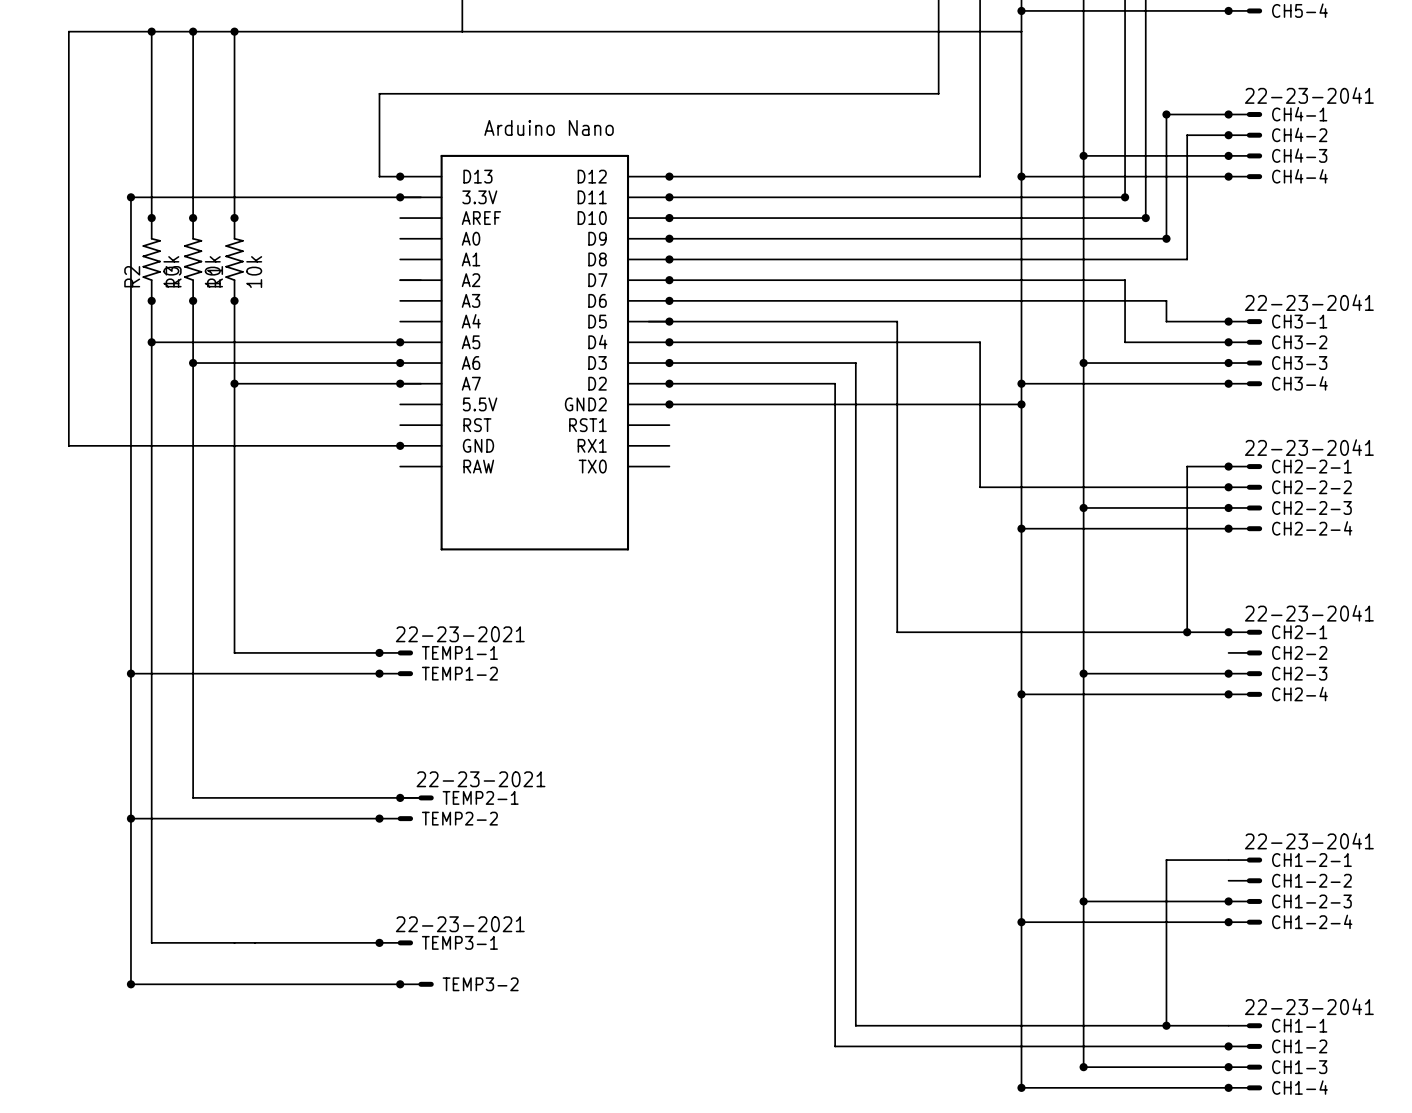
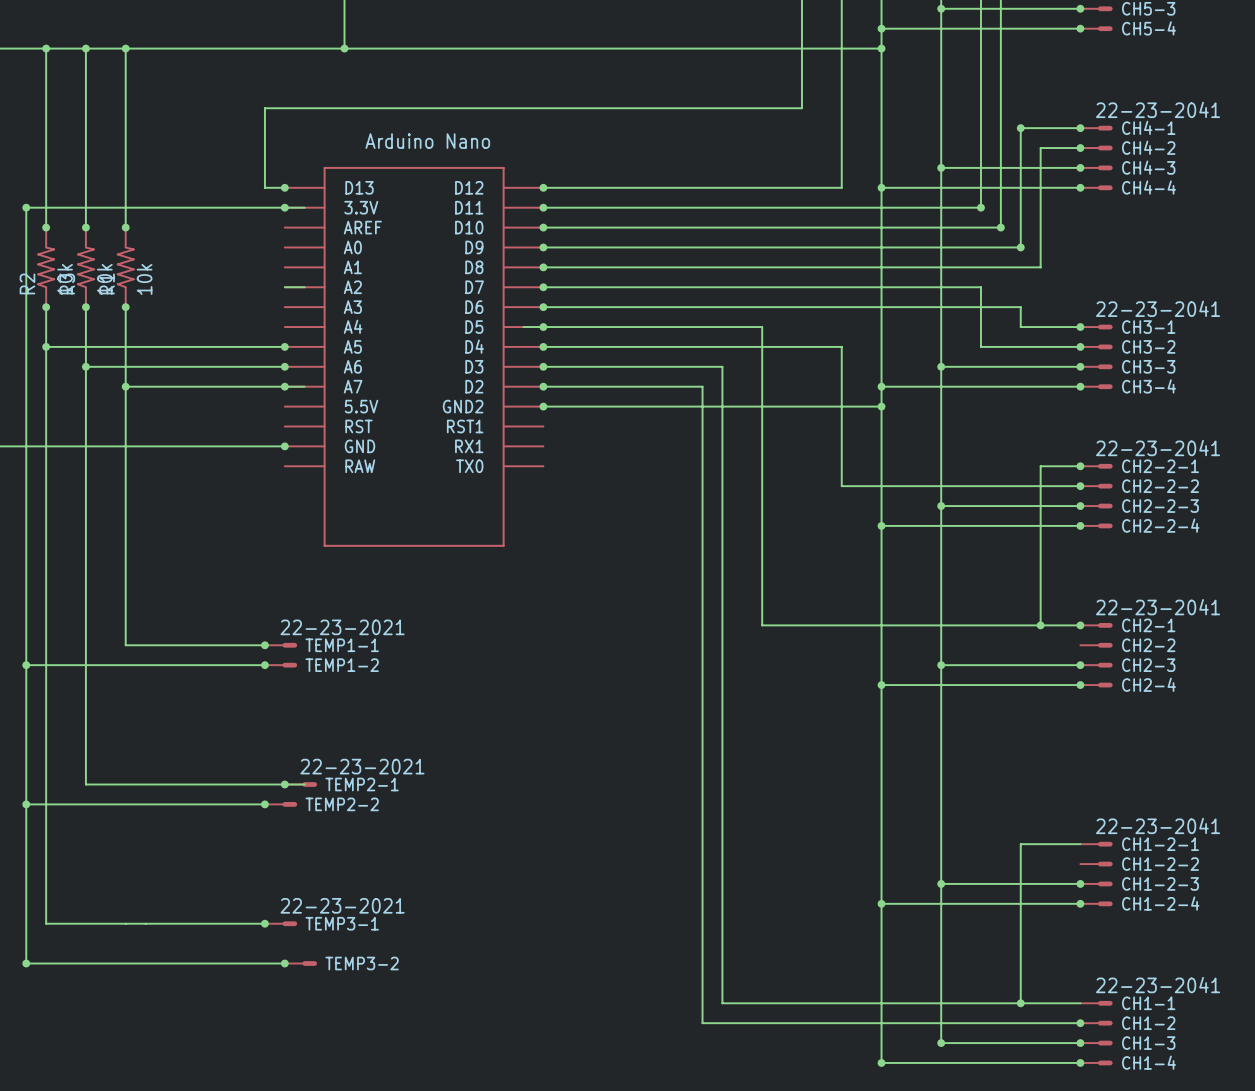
junction: none -> (344, 48)
junction: none -> (881, 48)

